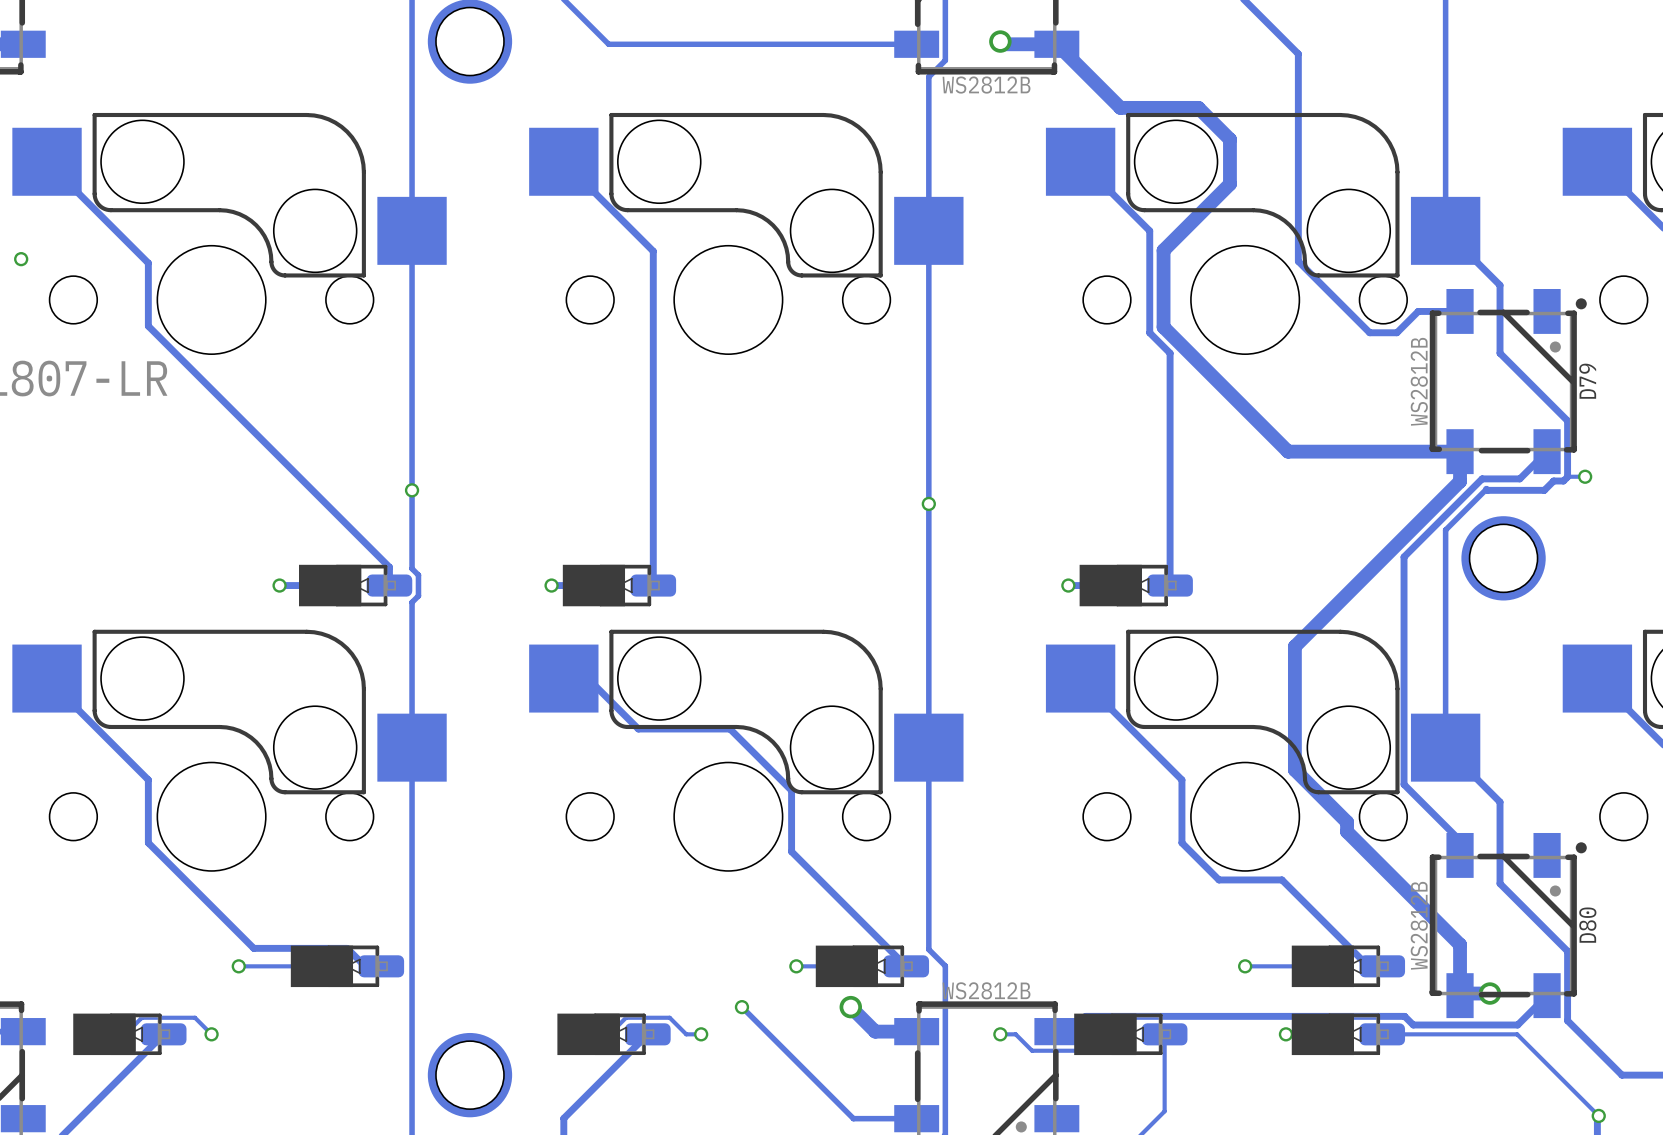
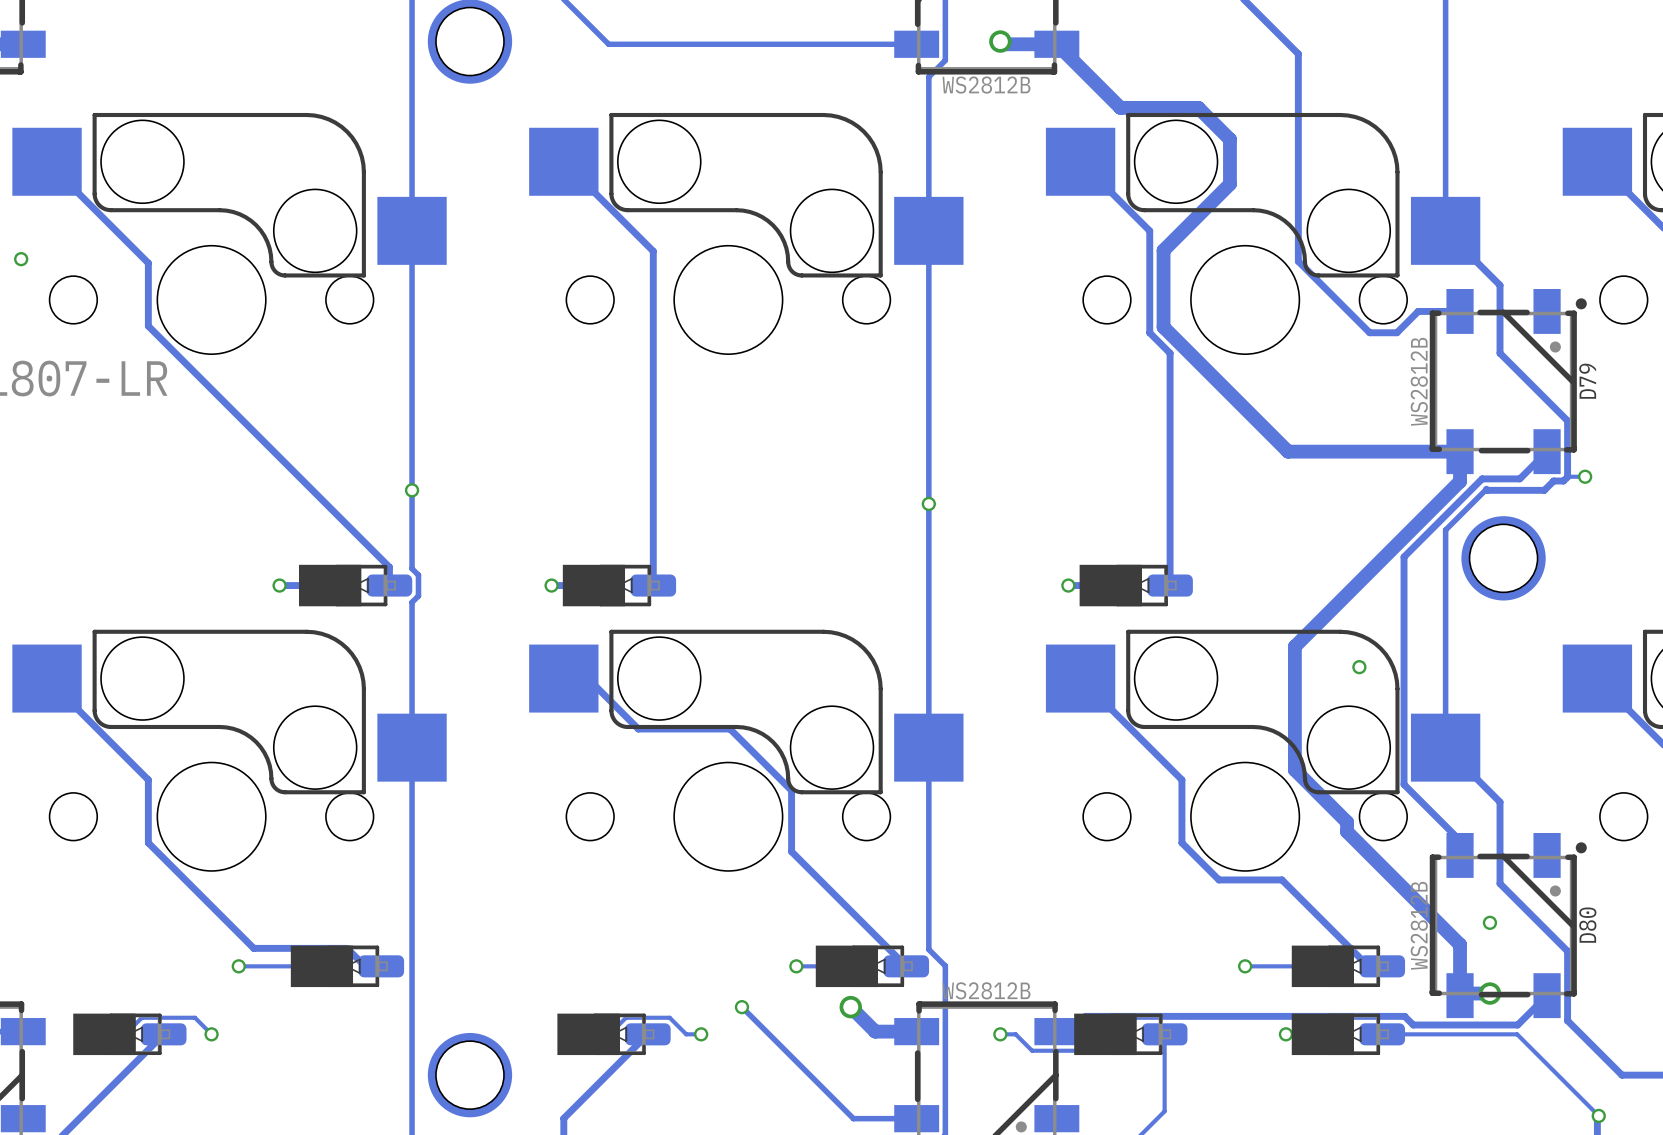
via: none -> (1359, 667)
via: none -> (1489, 922)

